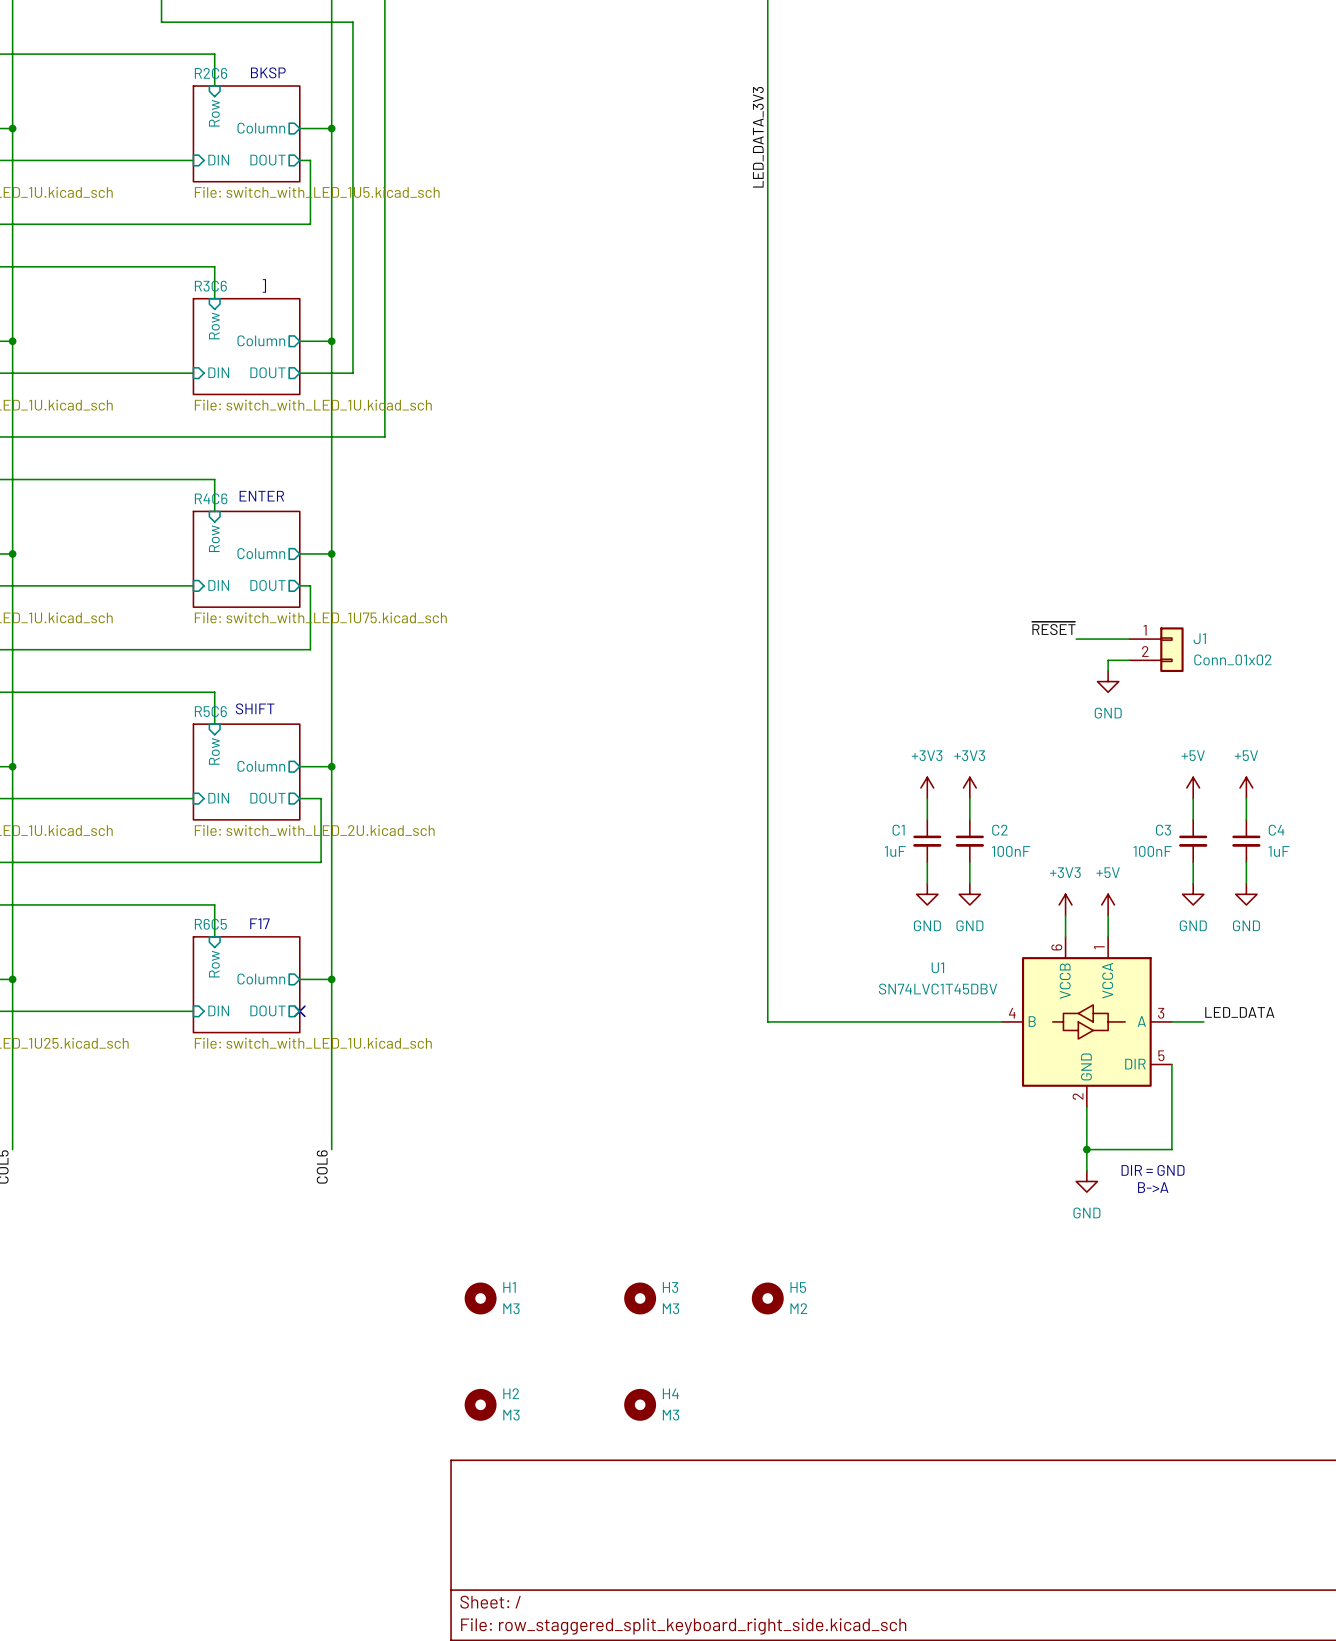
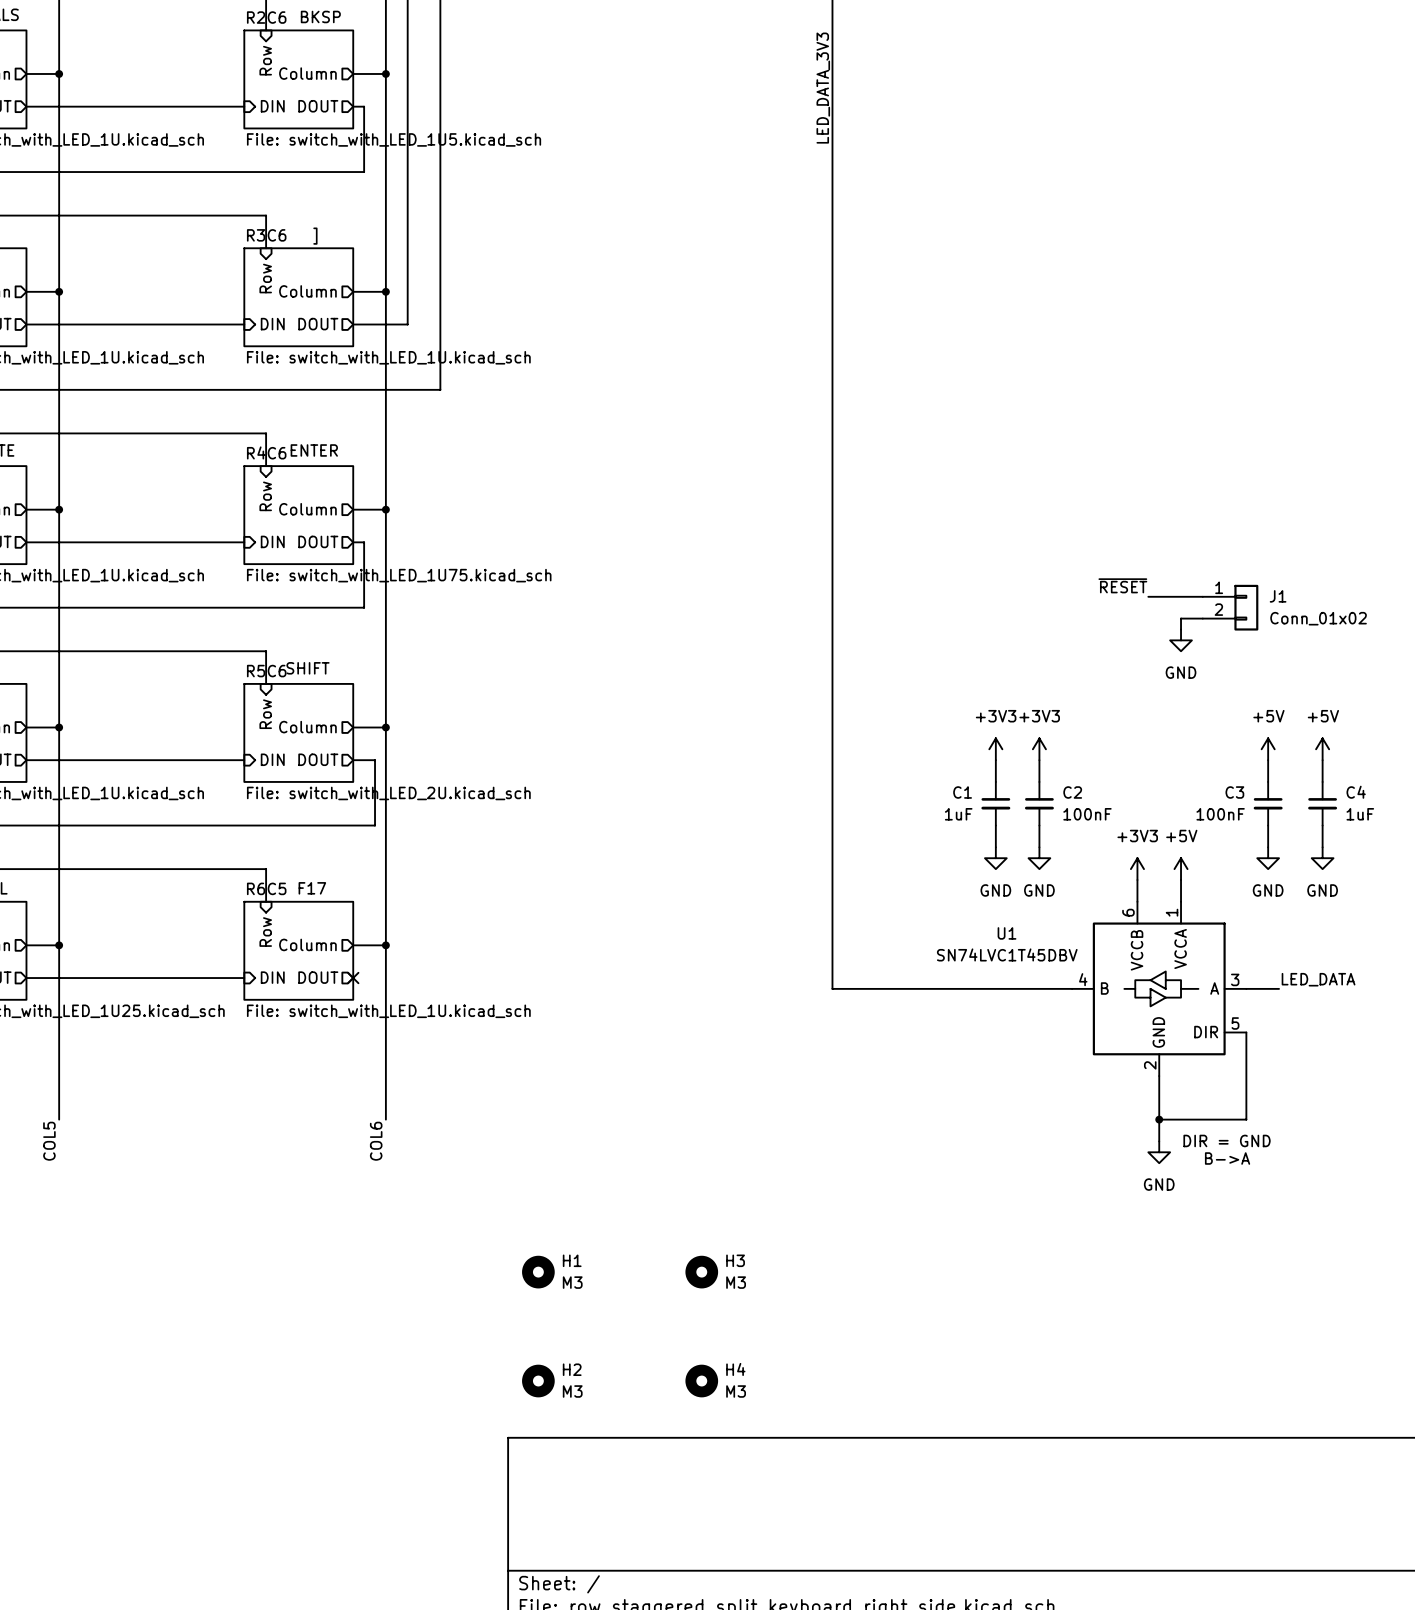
H5: M2 (767, 1298) -> none

